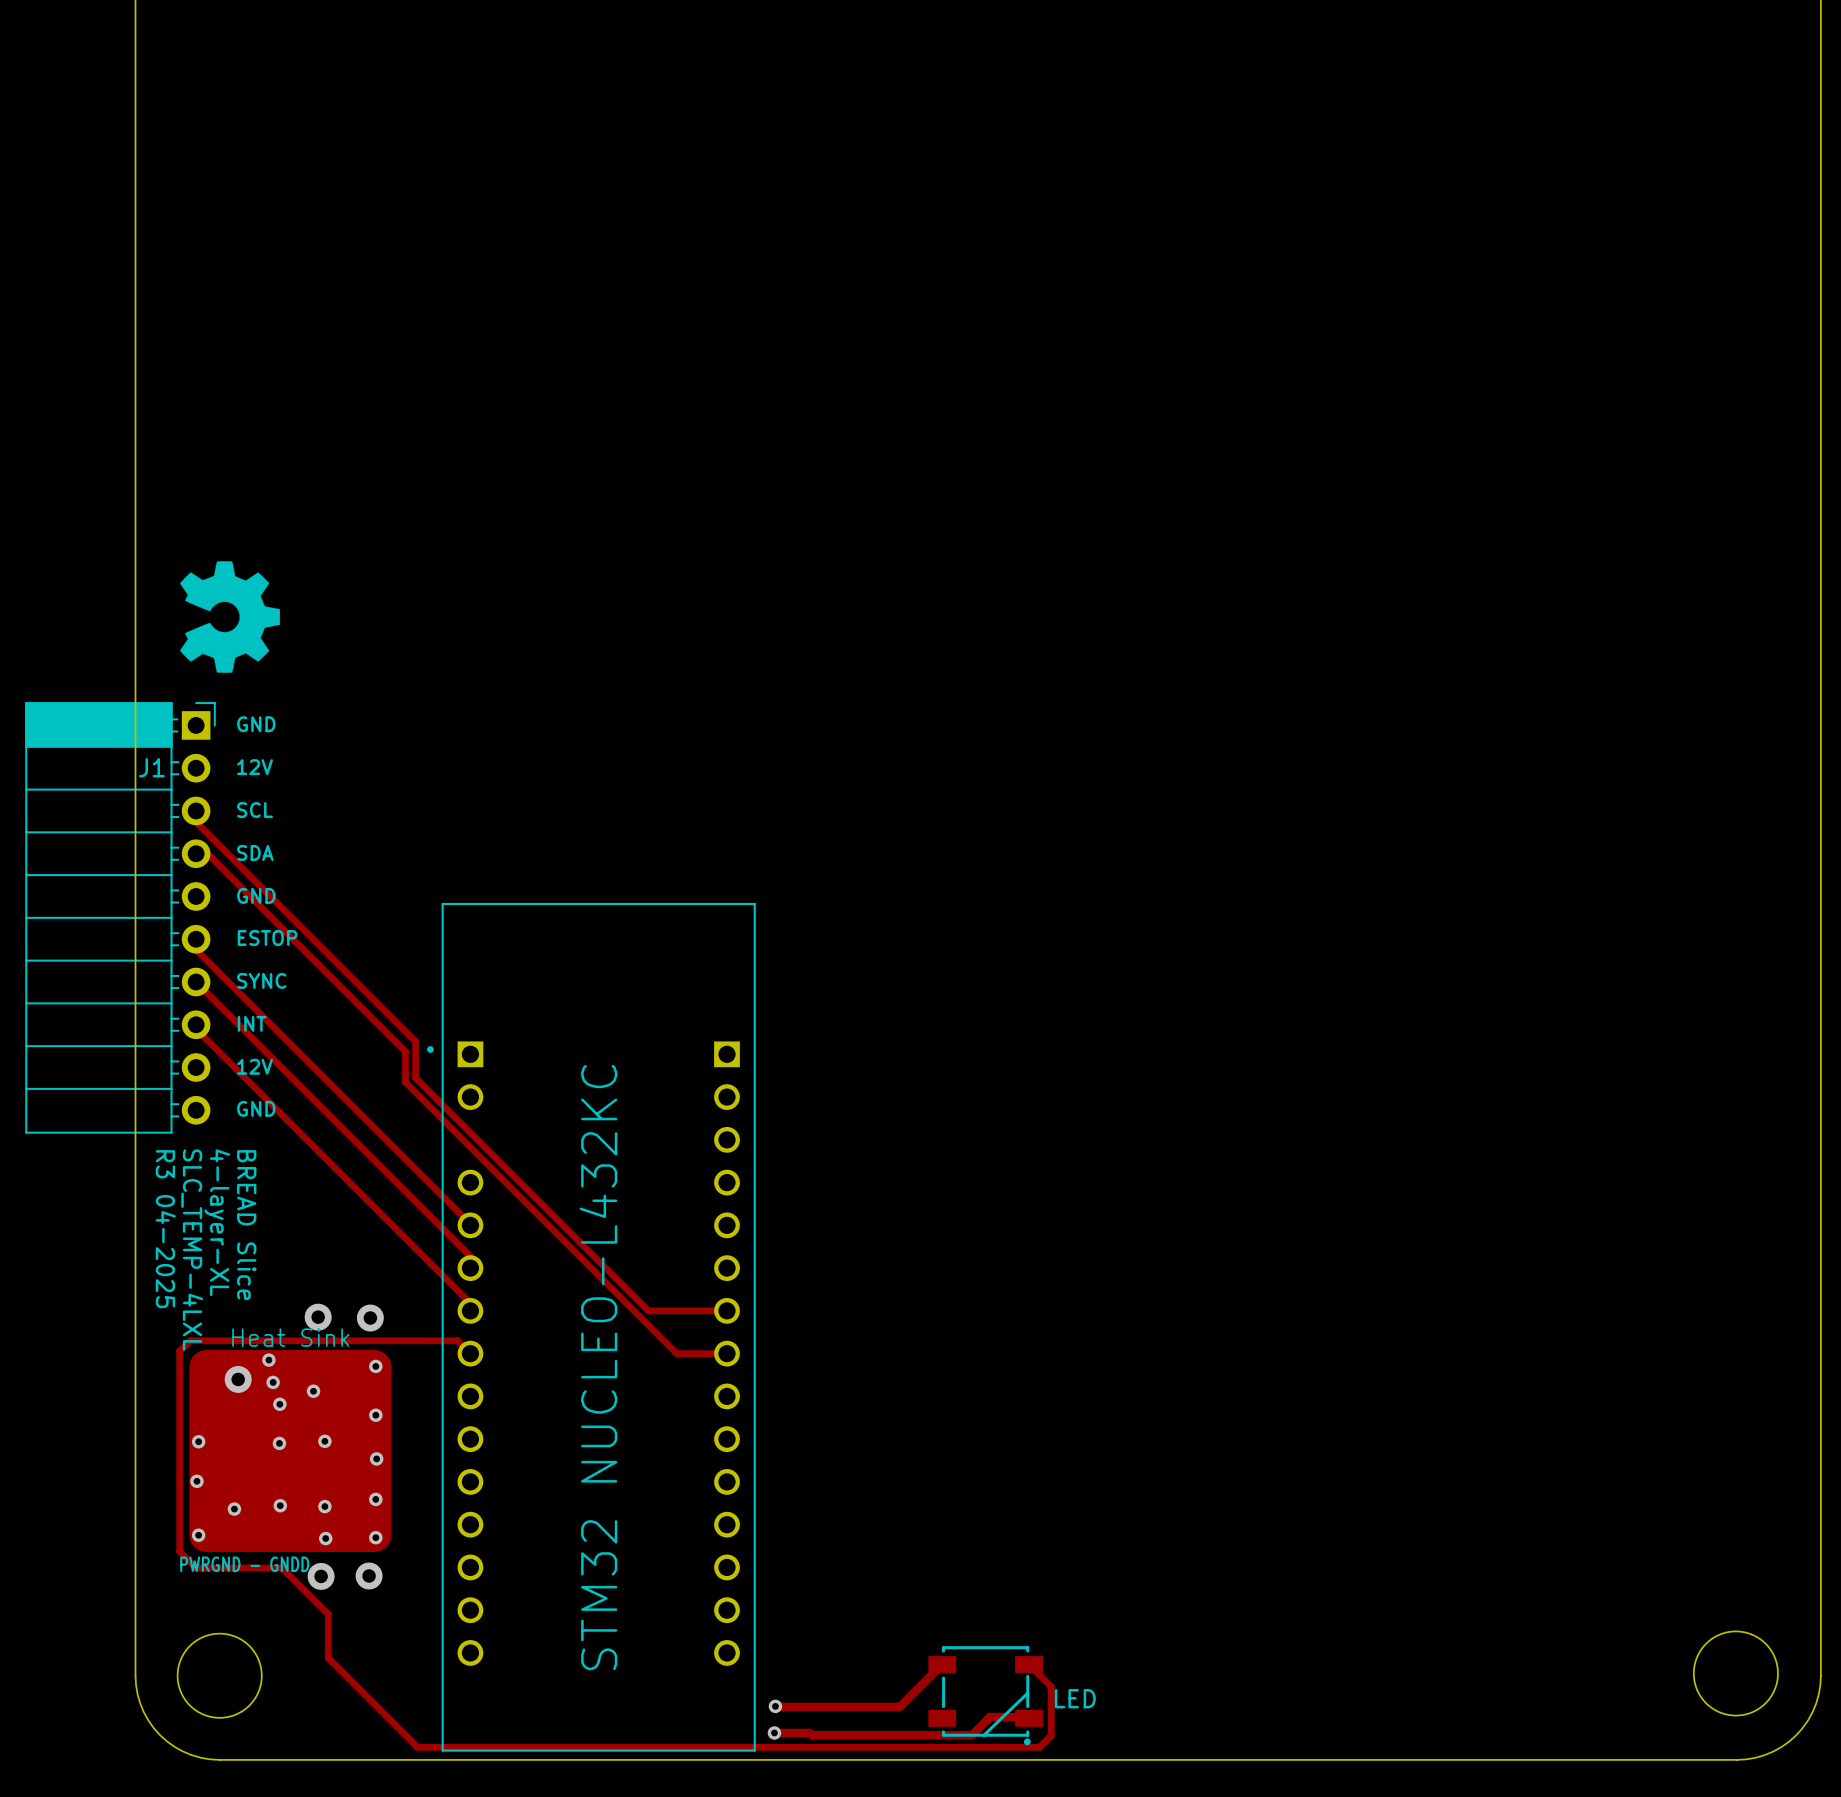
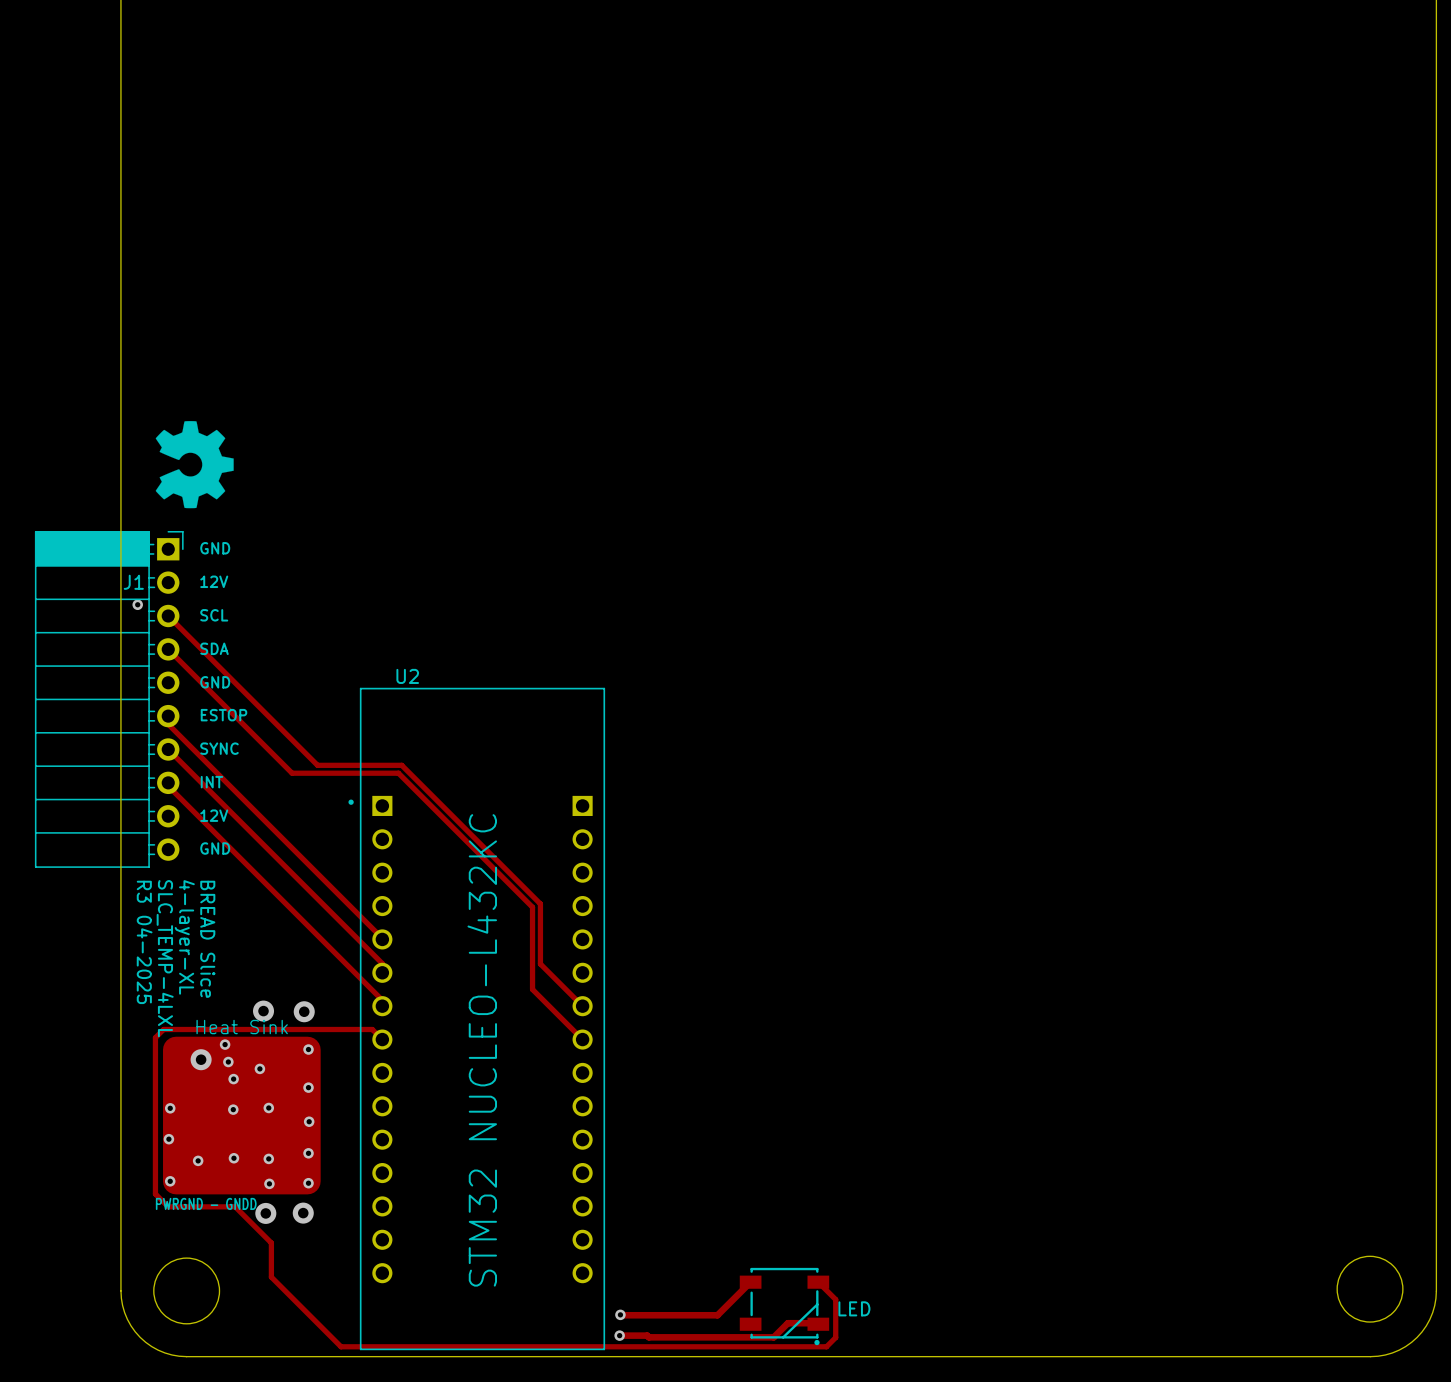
via: none -> (137, 604)
track: (196, 810) (196, 822) (415, 1041) (415, 1078) (648, 1310) (727, 1310) -> (168, 616) (317, 765) (401, 765) (540, 903) (540, 964) (582, 1006)
track: (196, 853) (207, 853) (405, 1051) (405, 1082) (676, 1353) (727, 1353) -> (168, 649) (292, 773) (398, 773) (532, 907) (532, 989) (582, 1039)
part: (591, 1327) -> none
U2: none -> (476, 1018)

